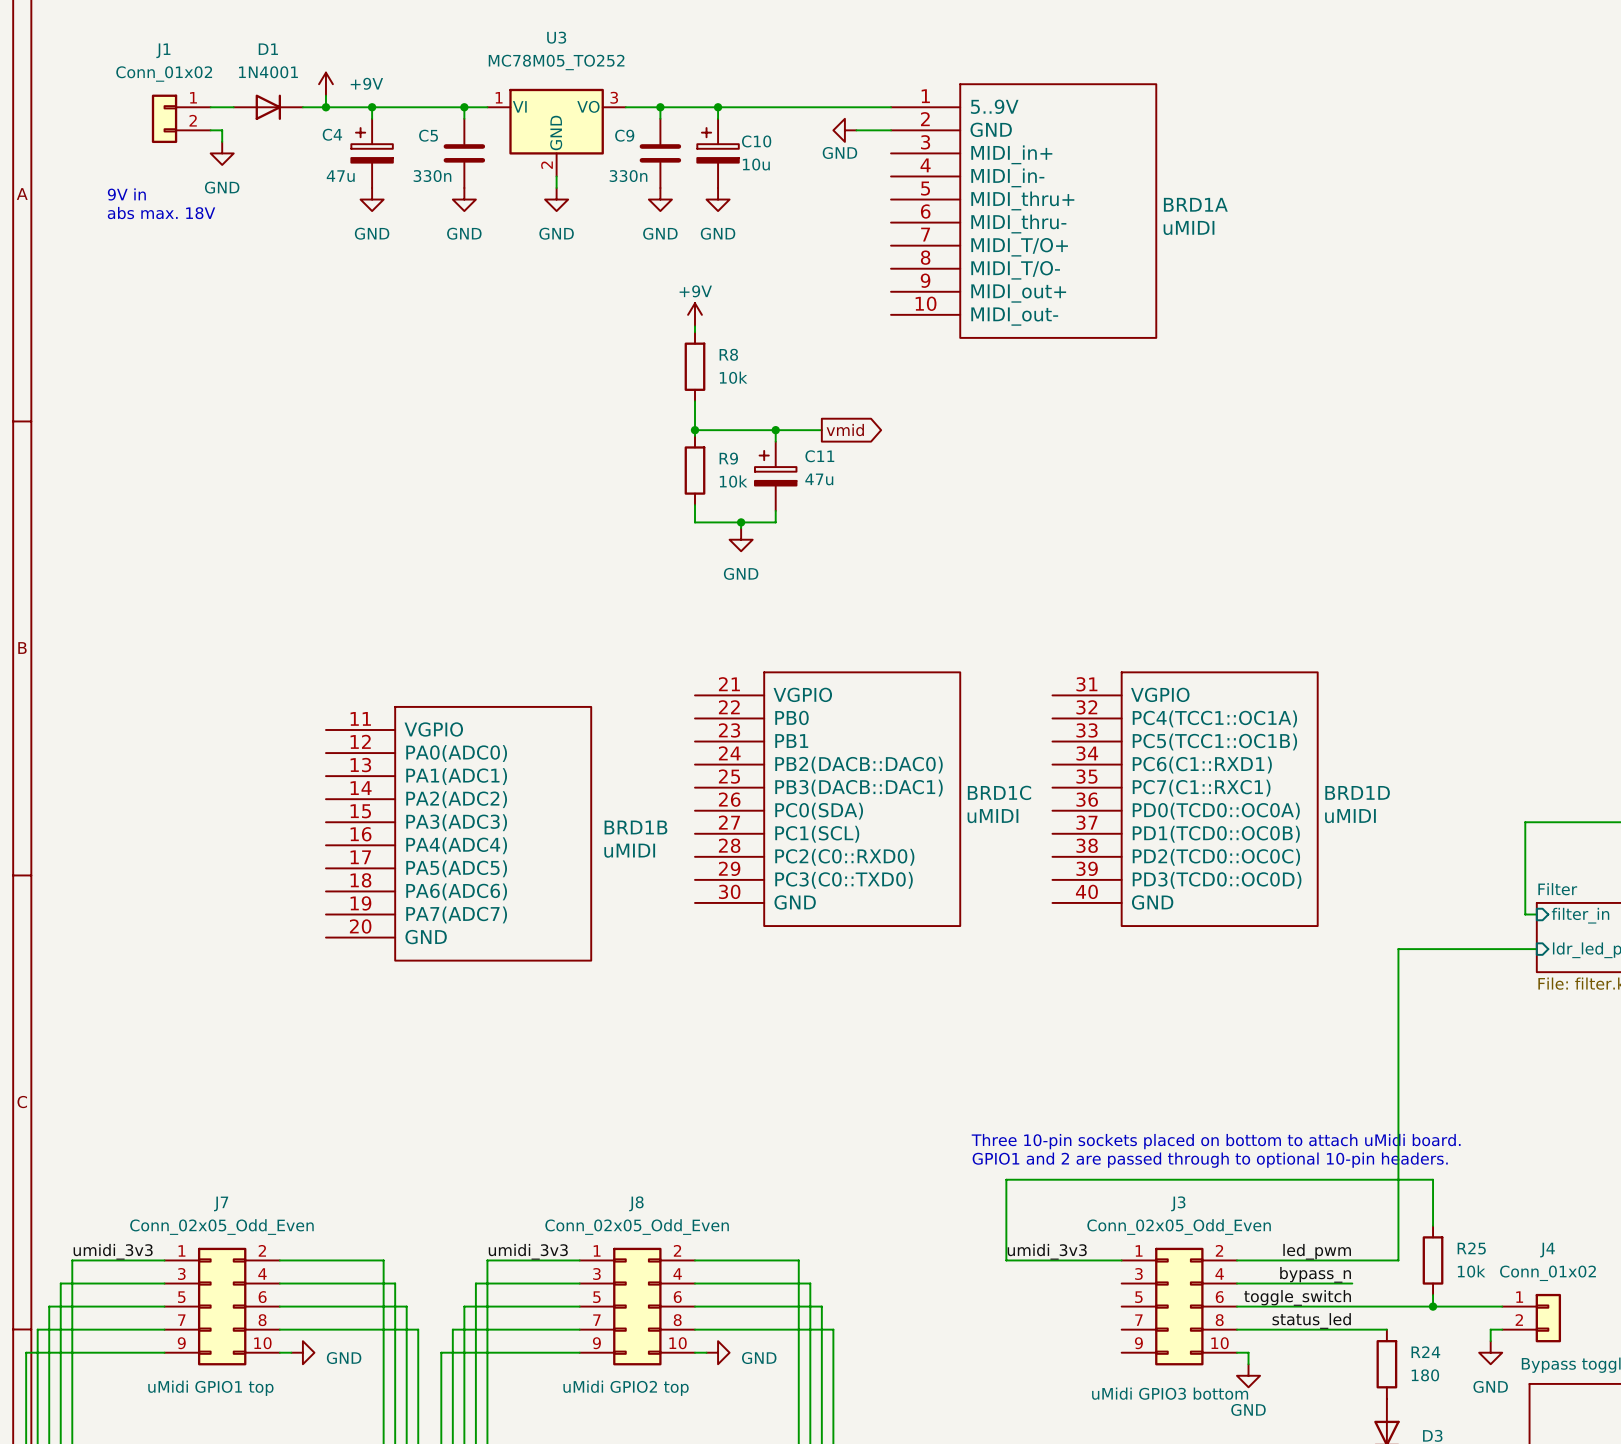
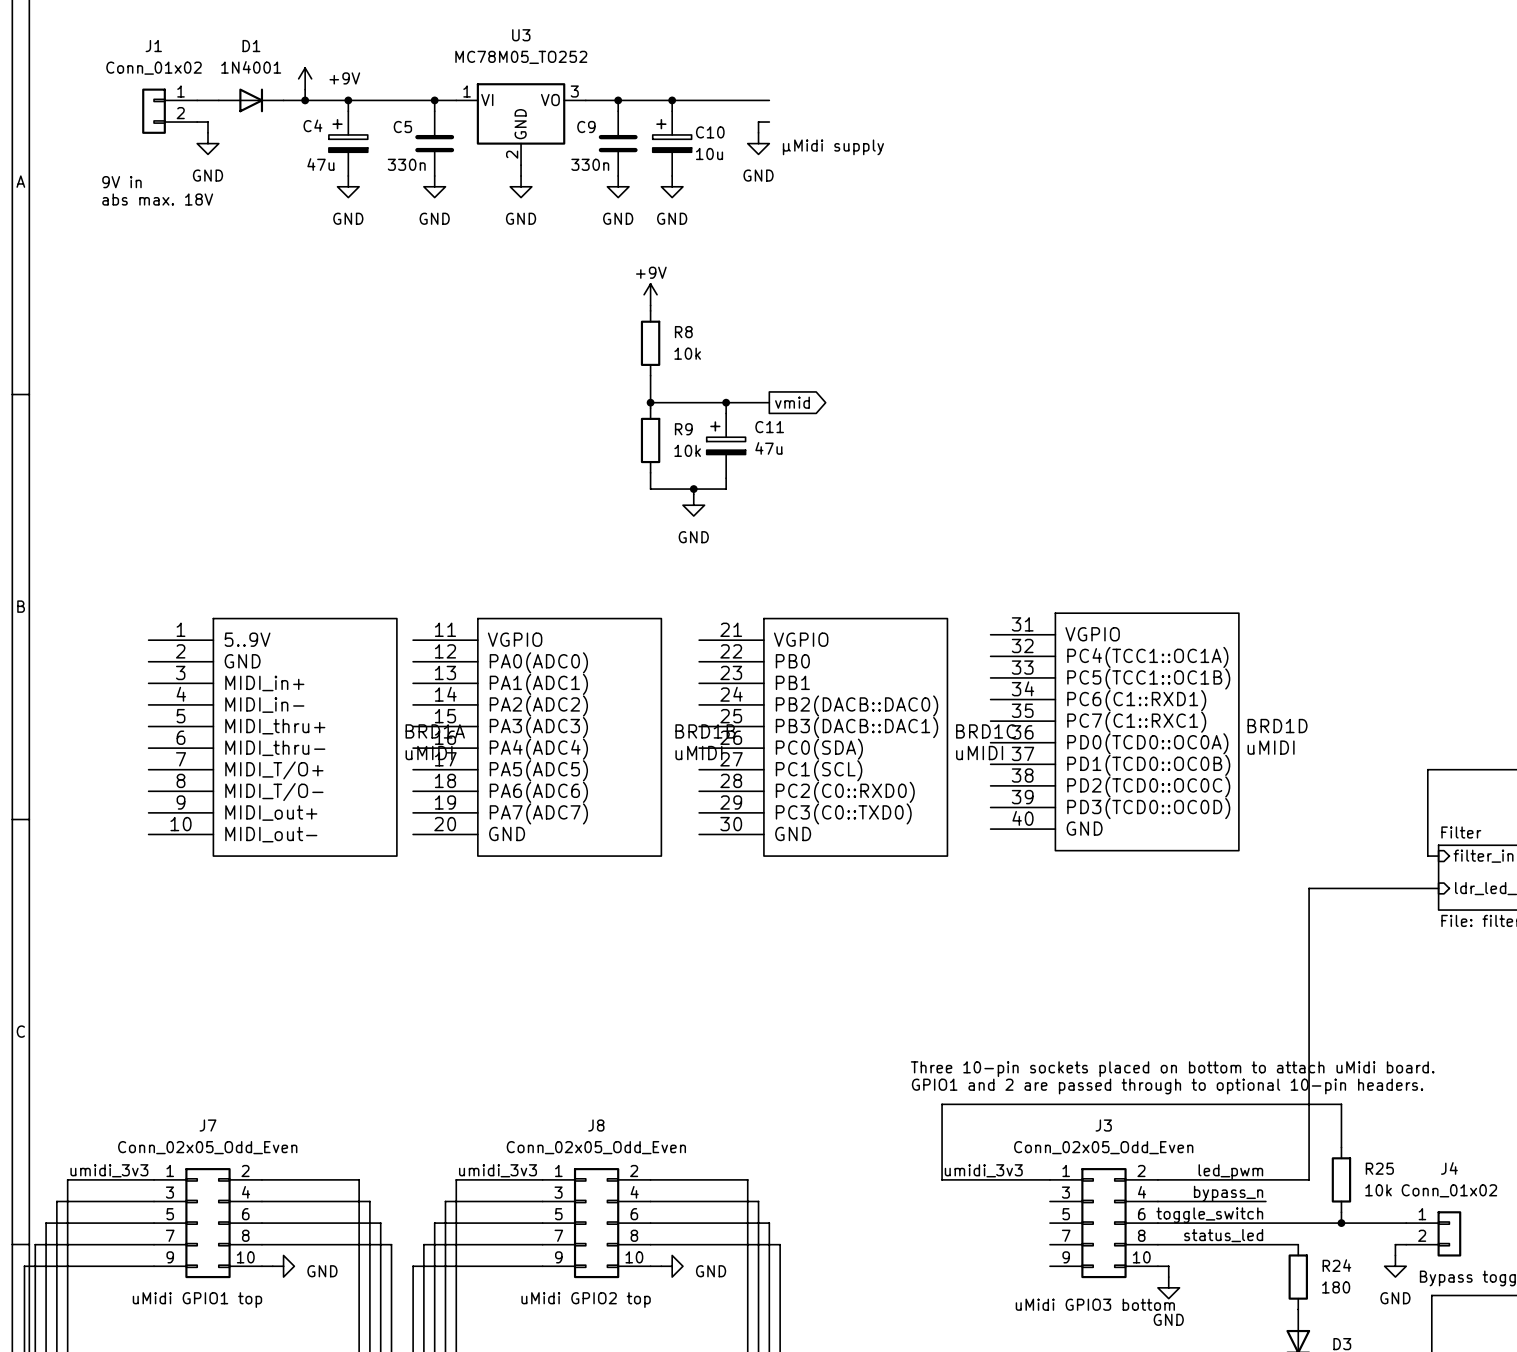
wire: (821, 107) (891, 107) -> none
wire: none -> (769, 122) (758, 122) (758, 132)
power symbol rotation: 0° (844, 130) -> 90° counterclockwise (758, 143)
power symbol position: GND (844, 130) -> GND (758, 143)
wire: (856, 130) (891, 130) -> none
text: none -> μMidi supply (833, 147)
BRD1A position: (1023, 211) -> (272, 737)
BRD1C position: (827, 799) -> (823, 737)
BRD1D position: (1185, 799) -> (1114, 731)
BRD1B position: (458, 833) -> (537, 737)

